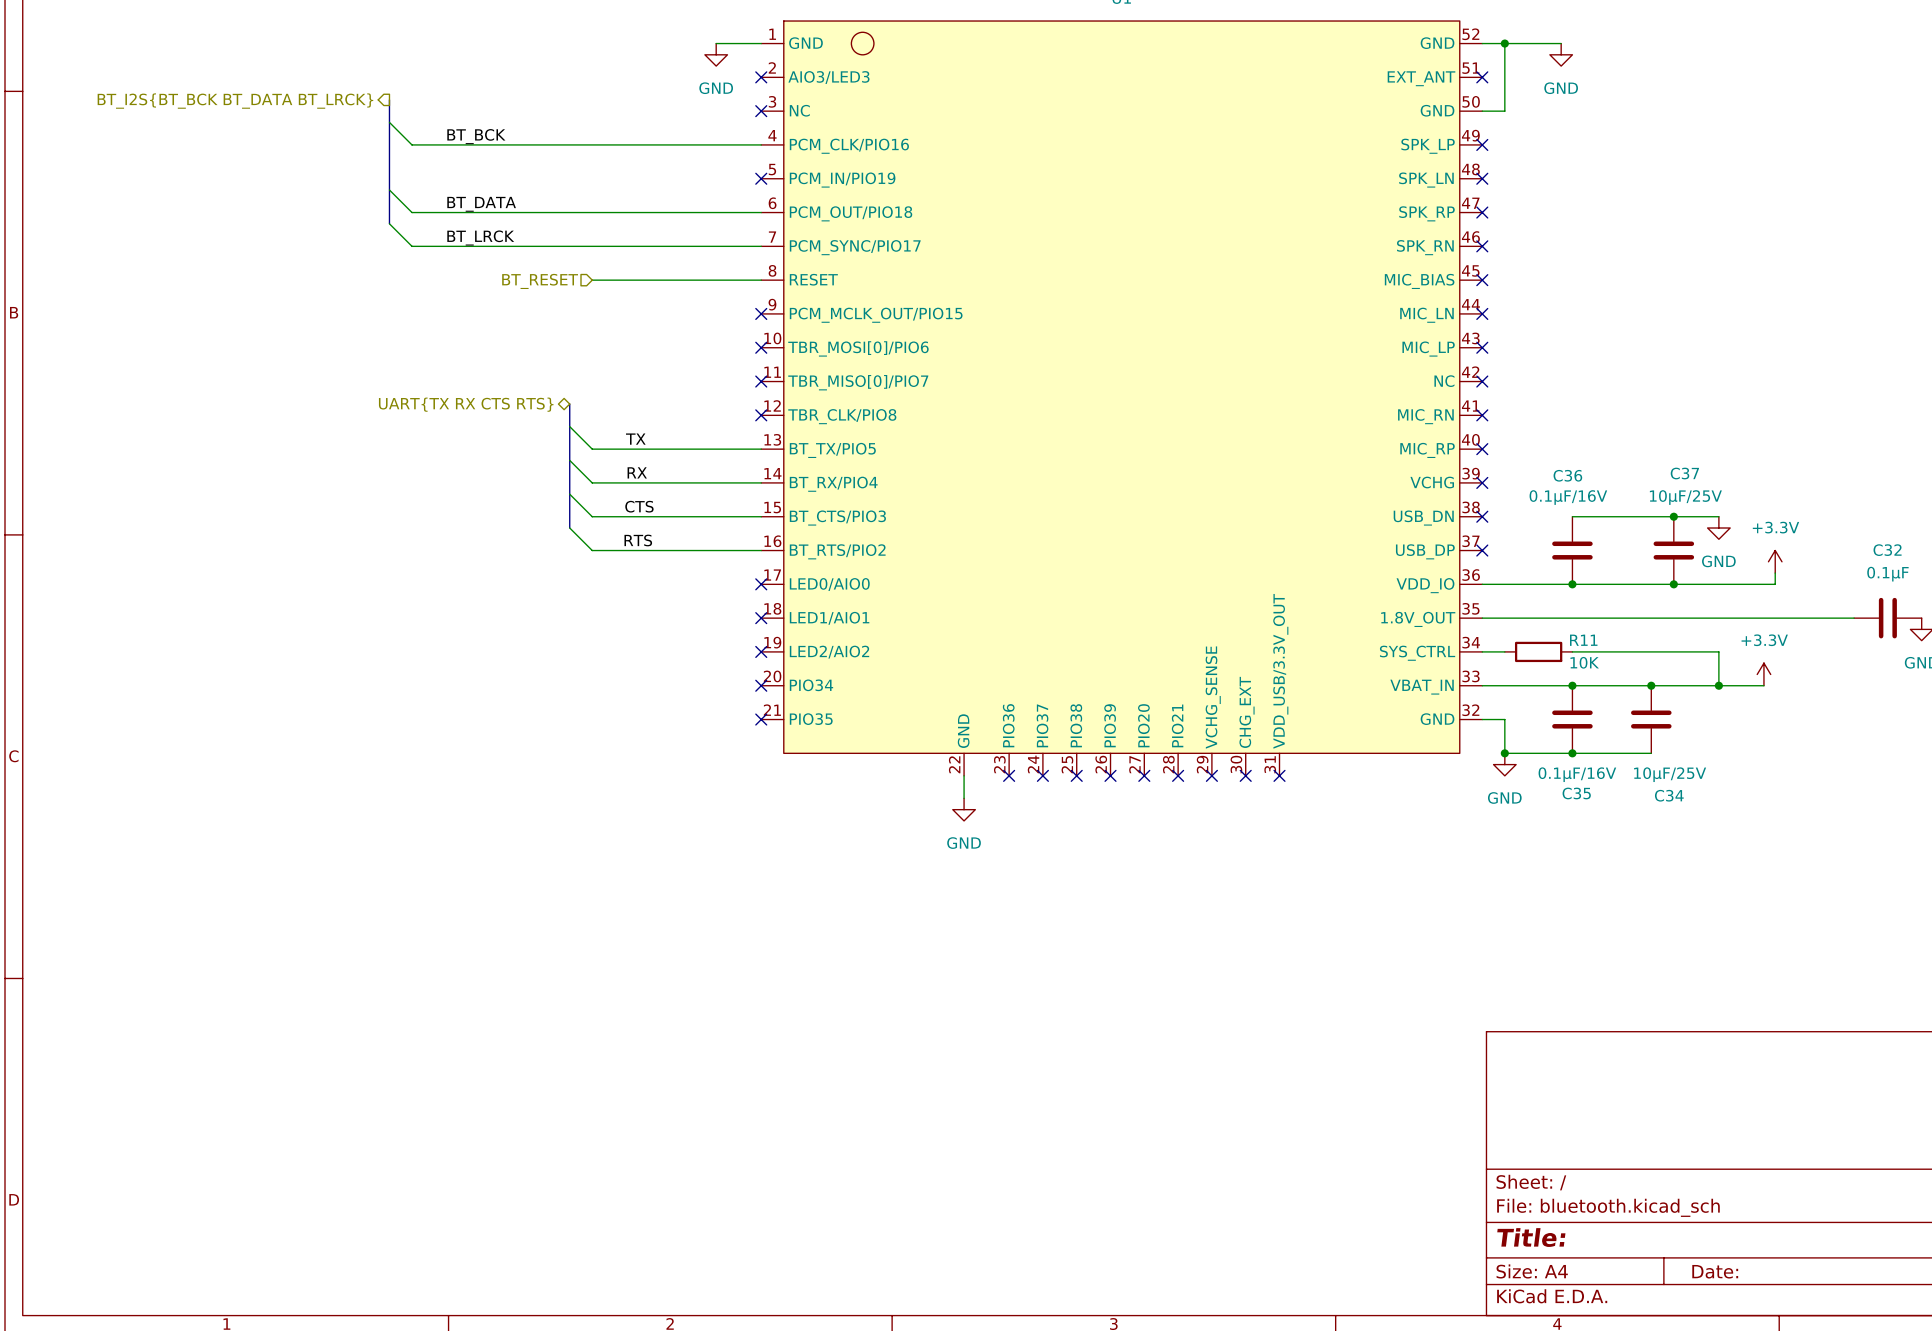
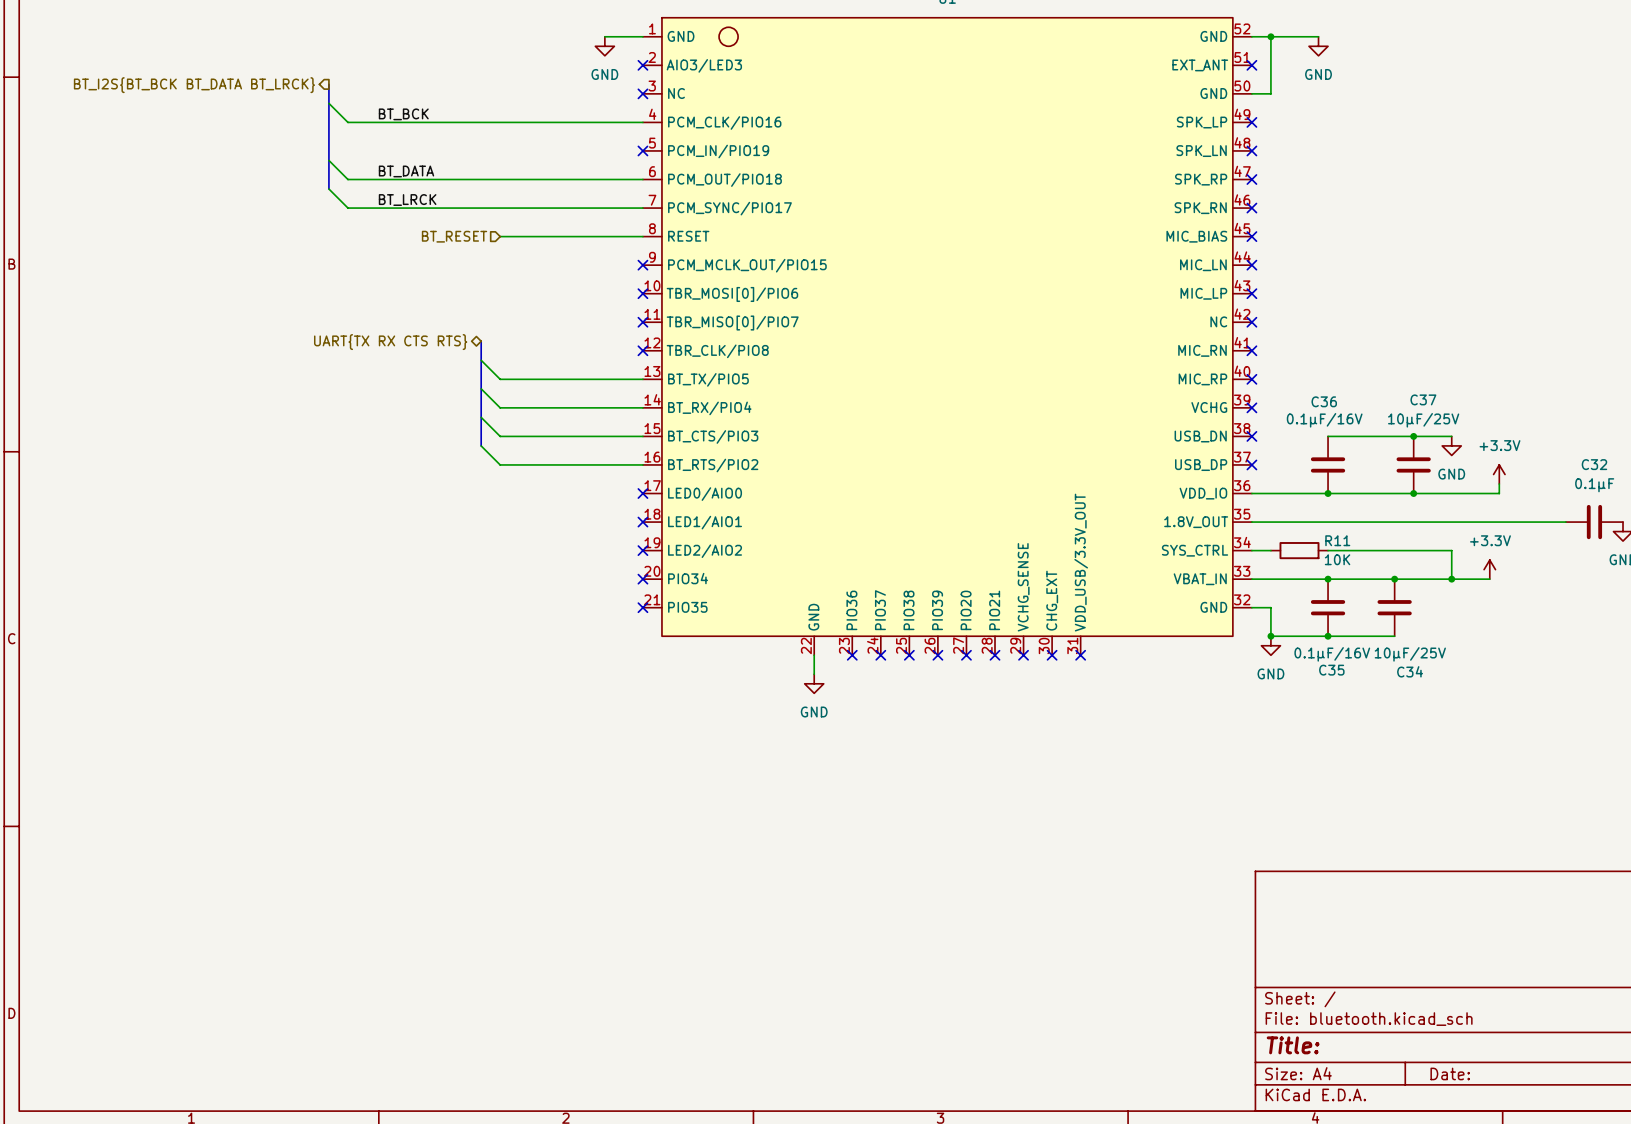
label: TX (635, 439) -> none
label: RX (637, 472) -> none
label: CTS (639, 506) -> none
label: RTS (638, 540) -> none

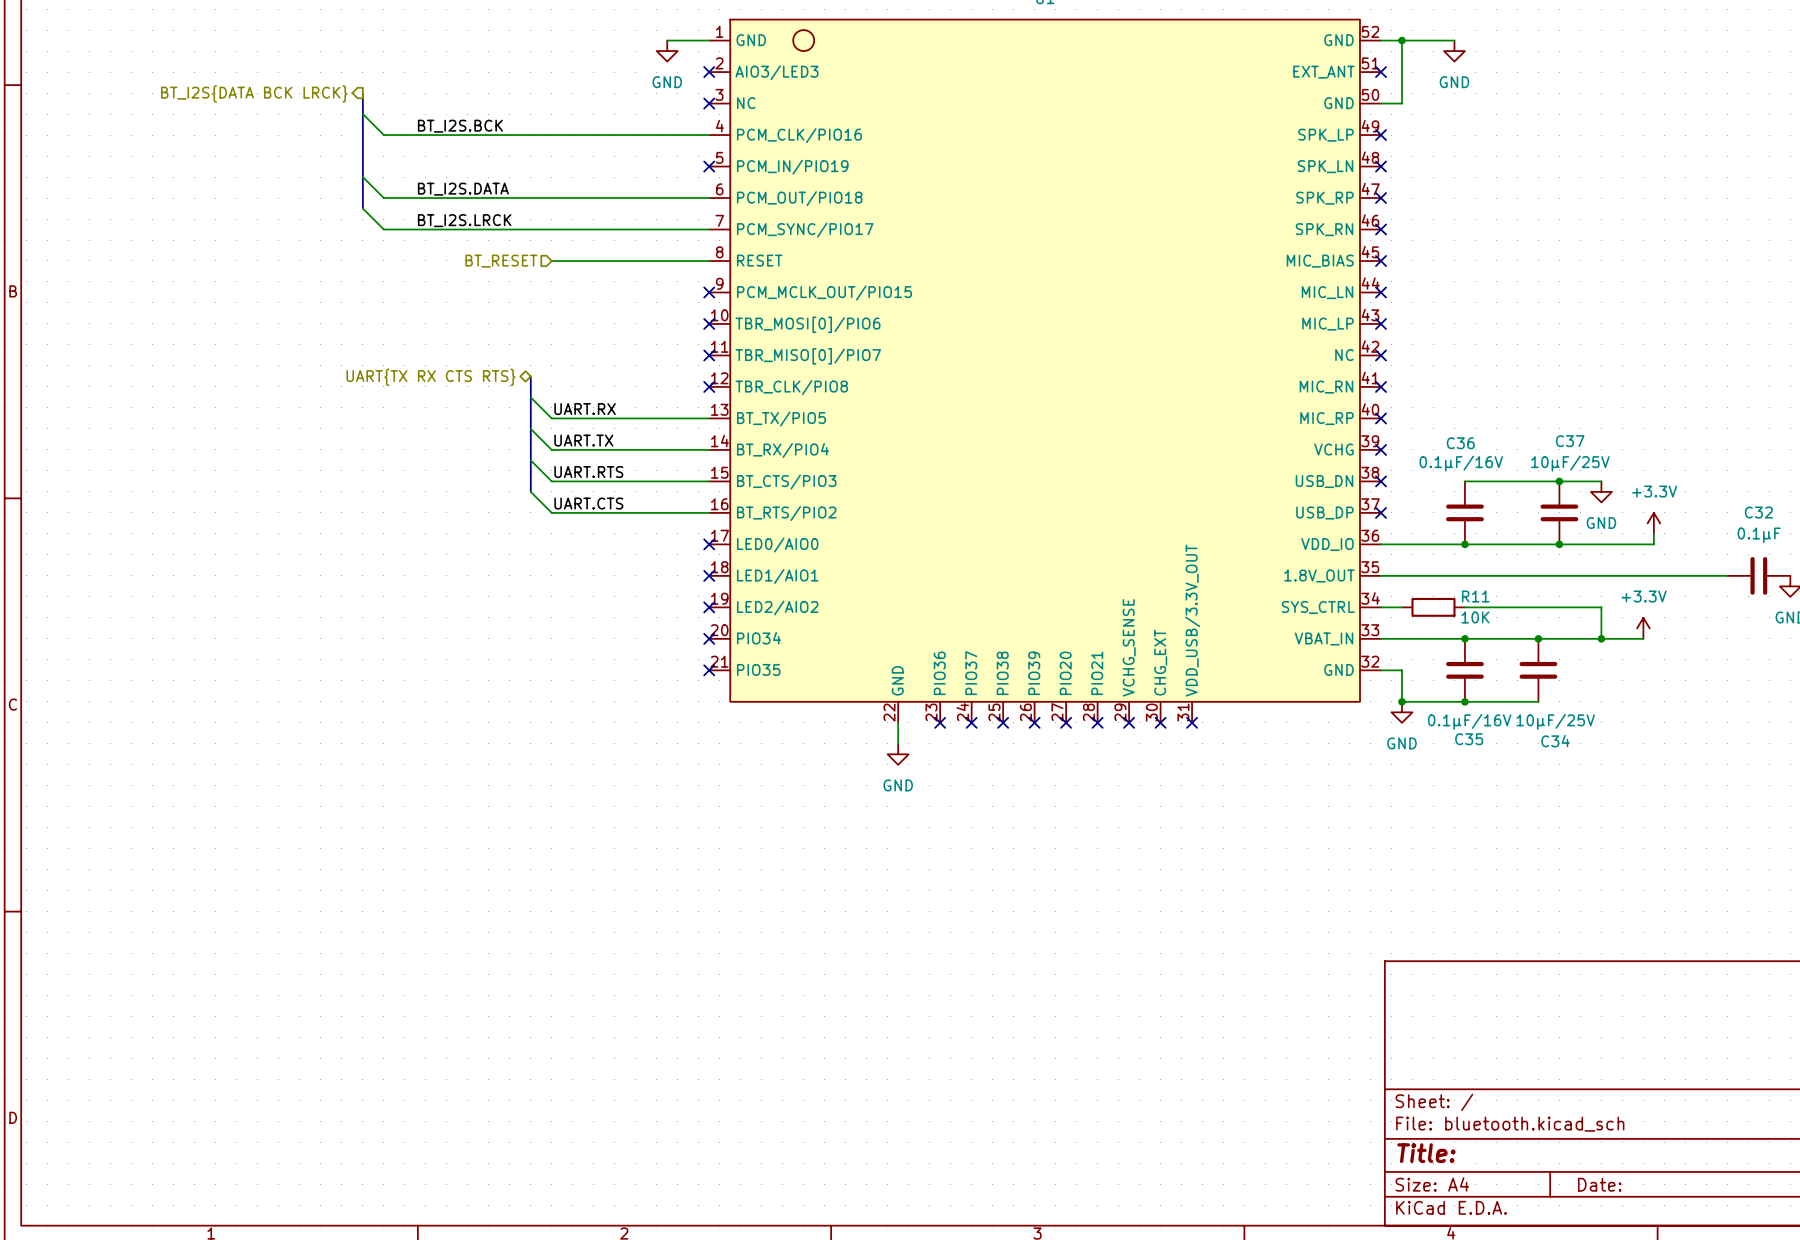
hierarchical label: BT_I2S{BT_BCK BT_DATA BT_LRCK} (194, 85) -> BT_I2S{DATA BCK LRCK} (254, 93)
label: BT_BCK (403, 114) -> BT_I2S.BCK (460, 126)
label: BT_DATA (406, 171) -> BT_I2S.DATA (463, 189)
label: BT_LRCK (407, 200) -> BT_I2S.LRCK (464, 220)
label: none -> UART.RX (585, 409)
label: none -> UART.TX (583, 440)
label: none -> UART.RTS (588, 472)
label: none -> UART.CTS (588, 503)

